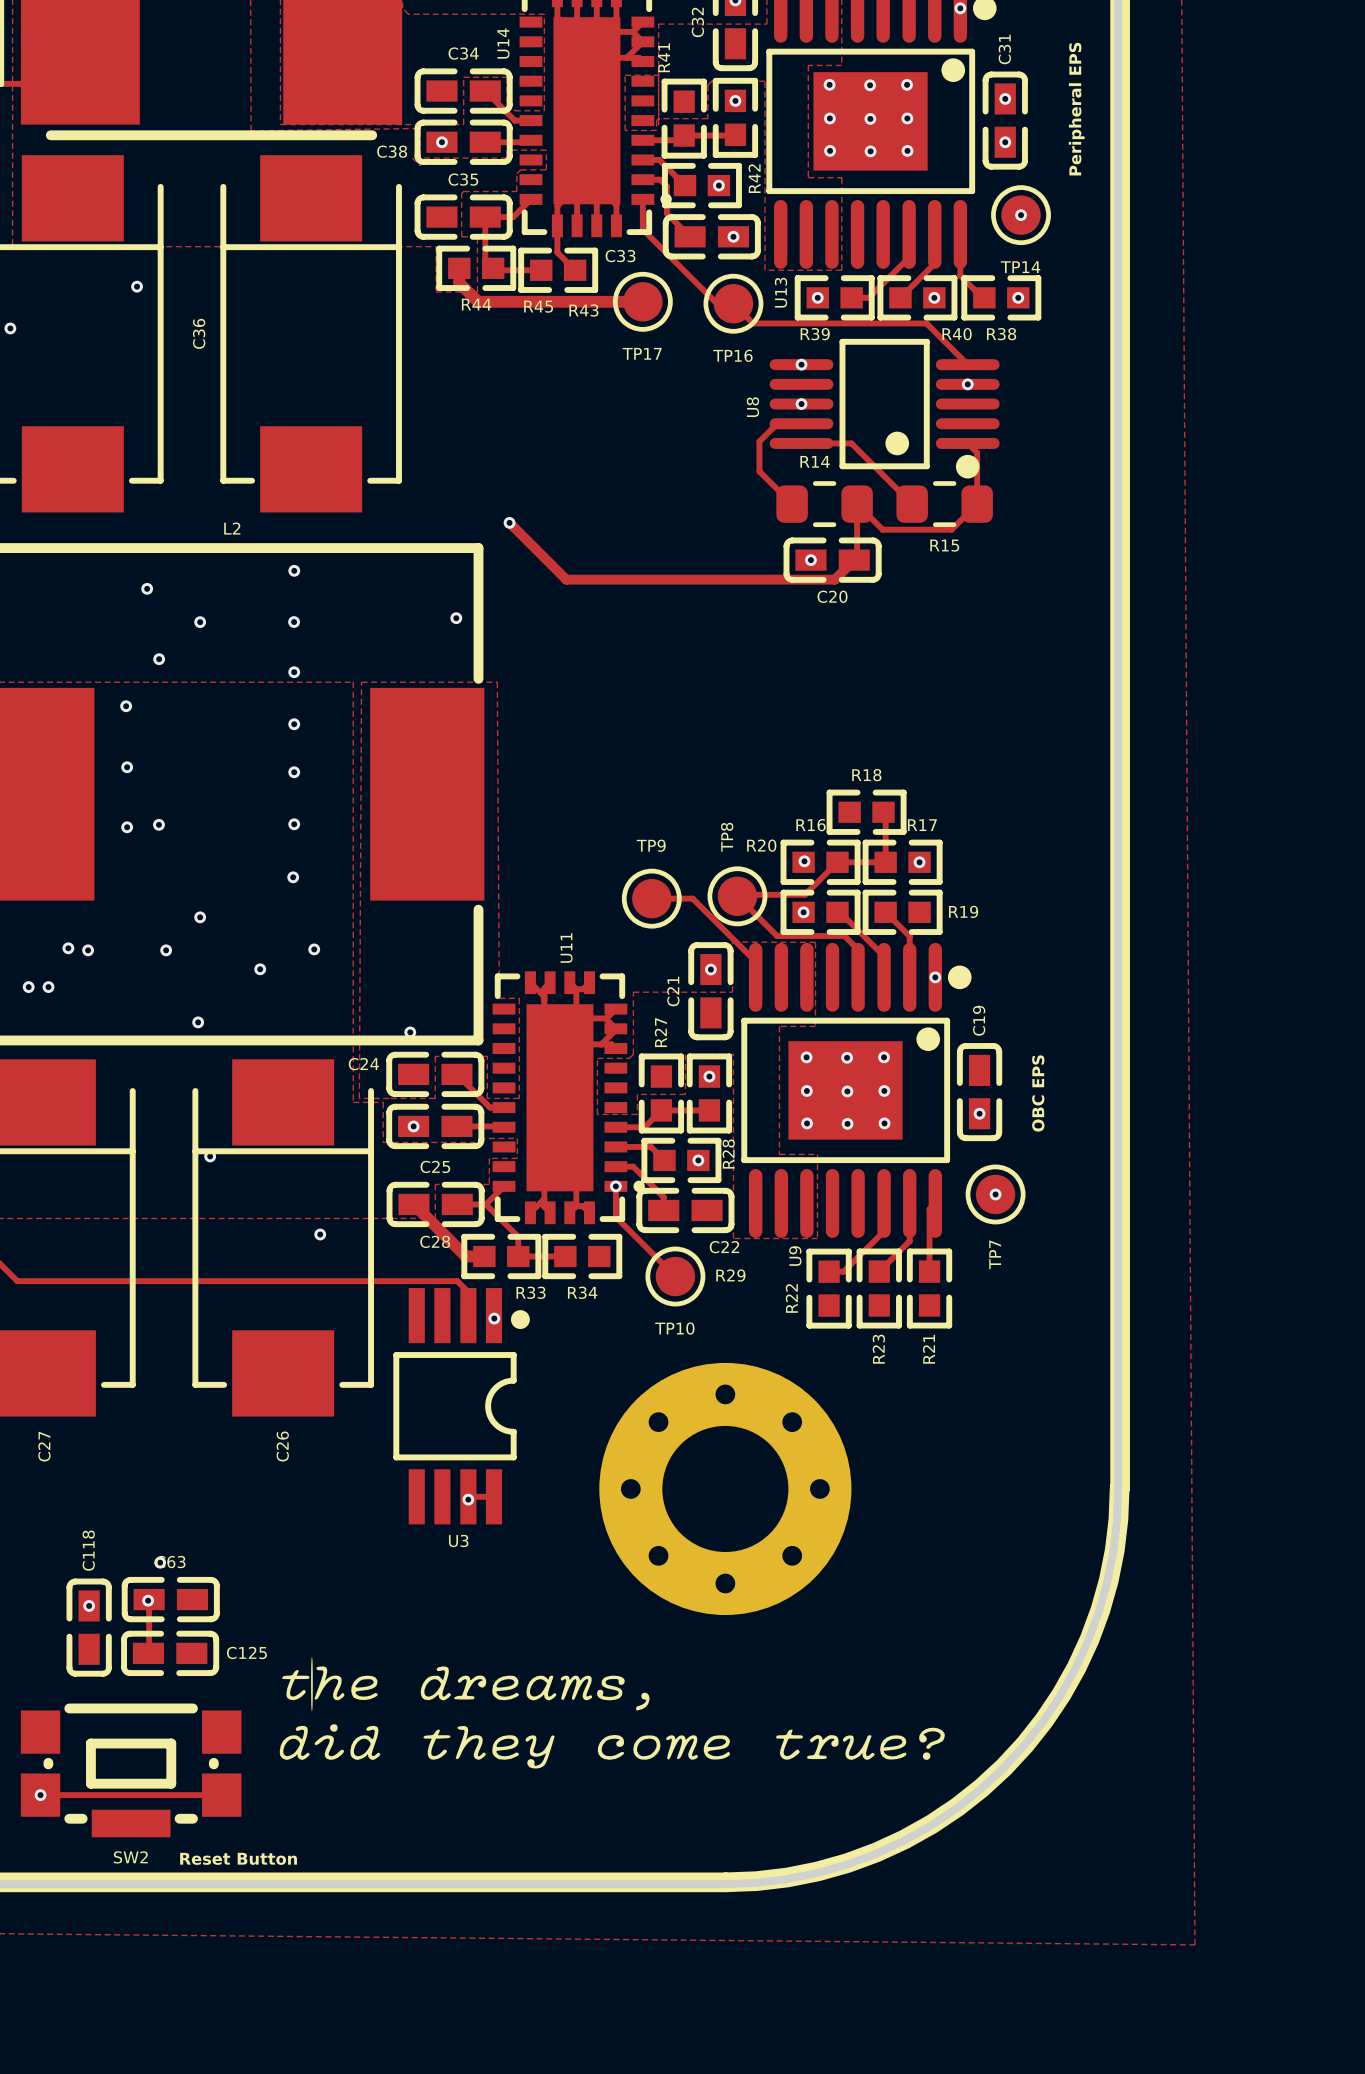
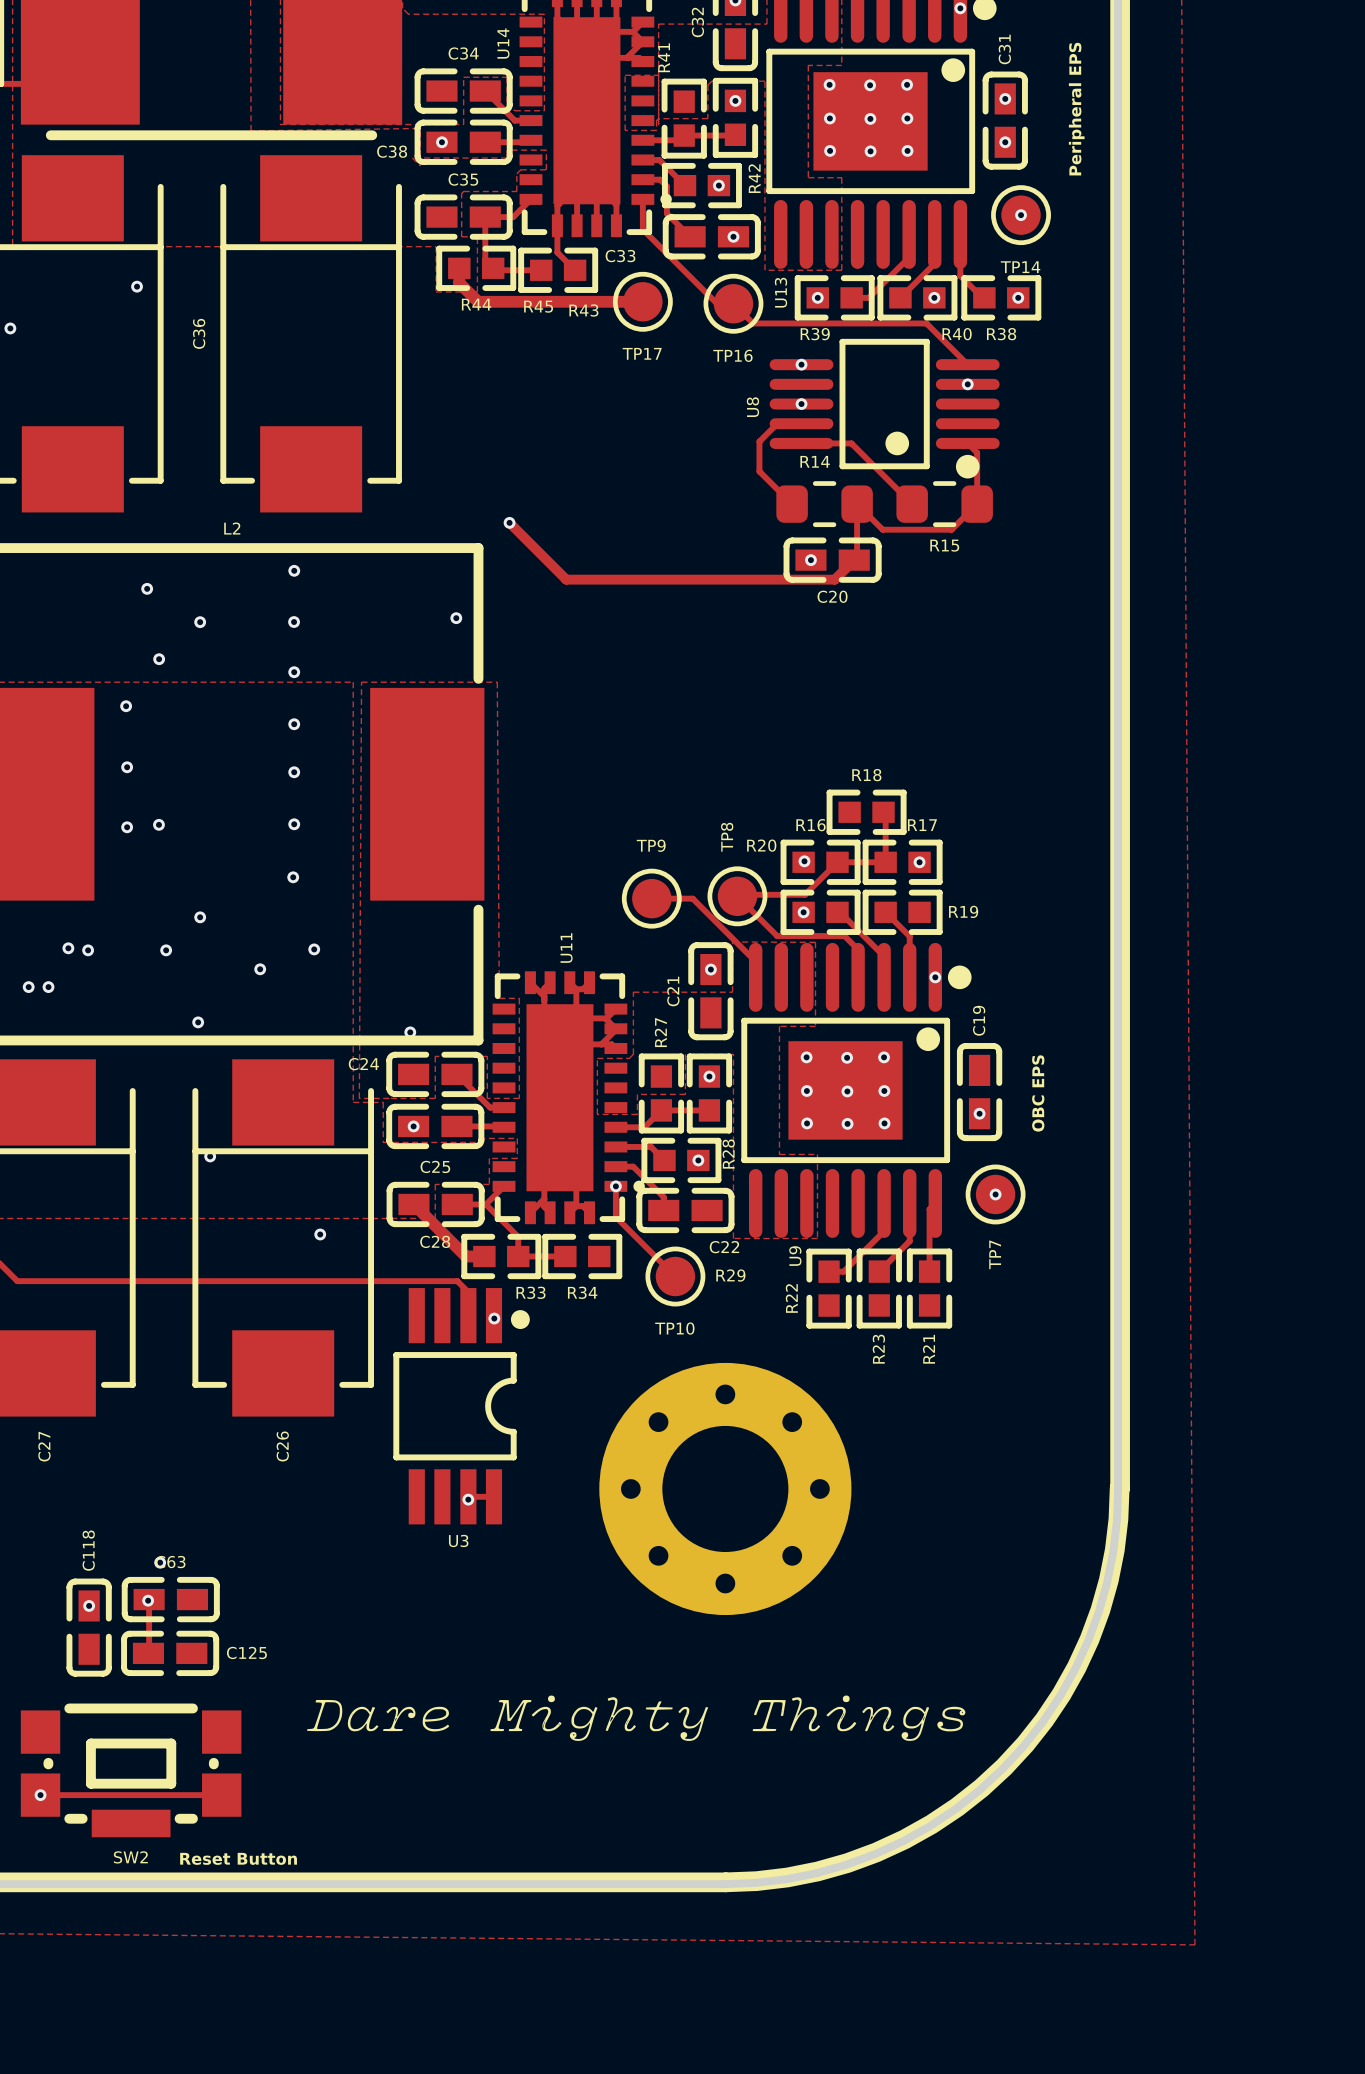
drawing shape: [279, 1656, 945, 1769] -> [306, 1695, 966, 1741]

